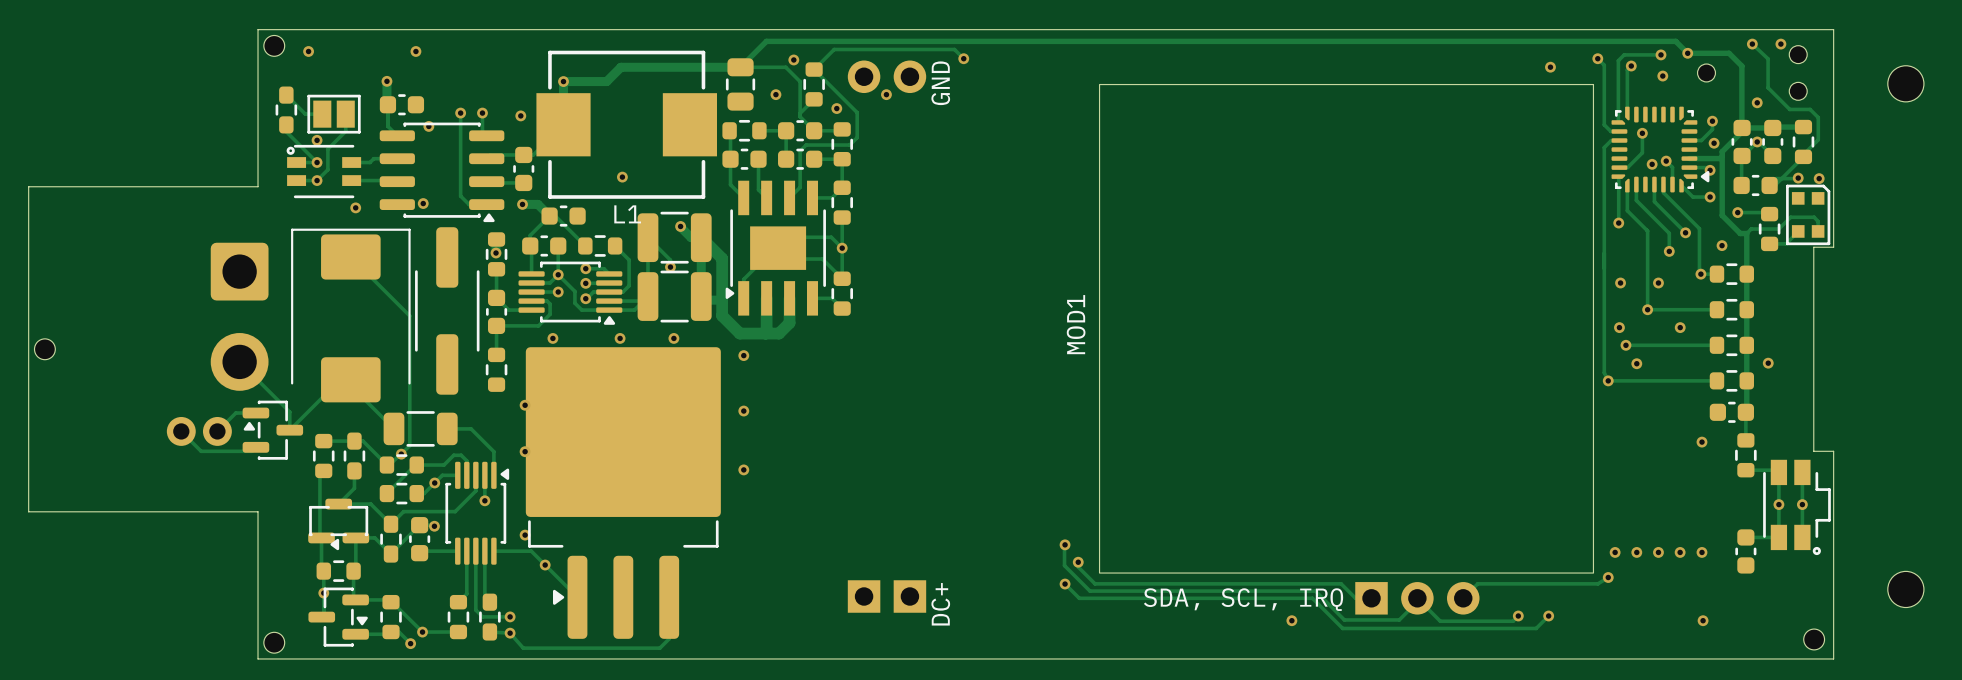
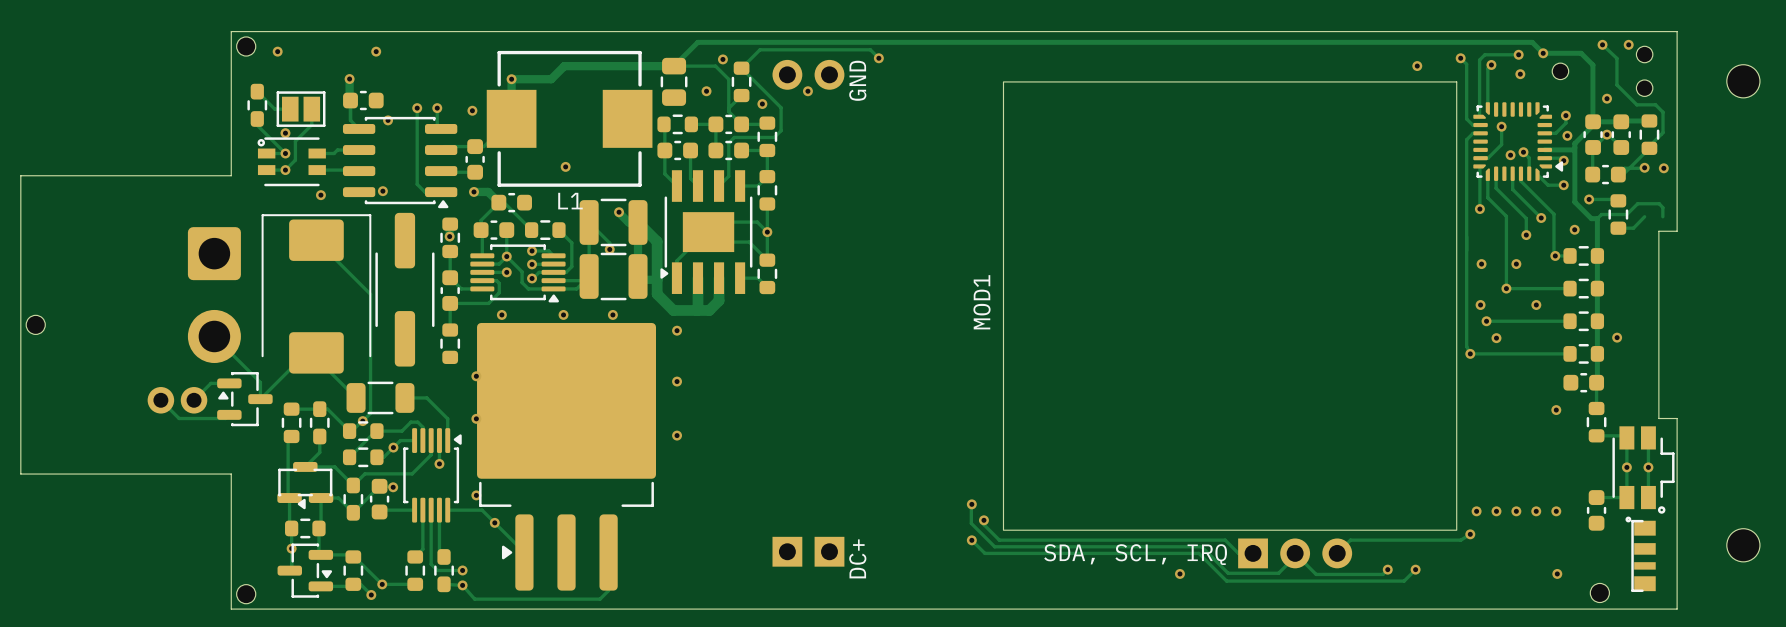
part: (1808, 214) -> none
part: none -> (1640, 554)
part position: (1814, 639) -> (1599, 592)

